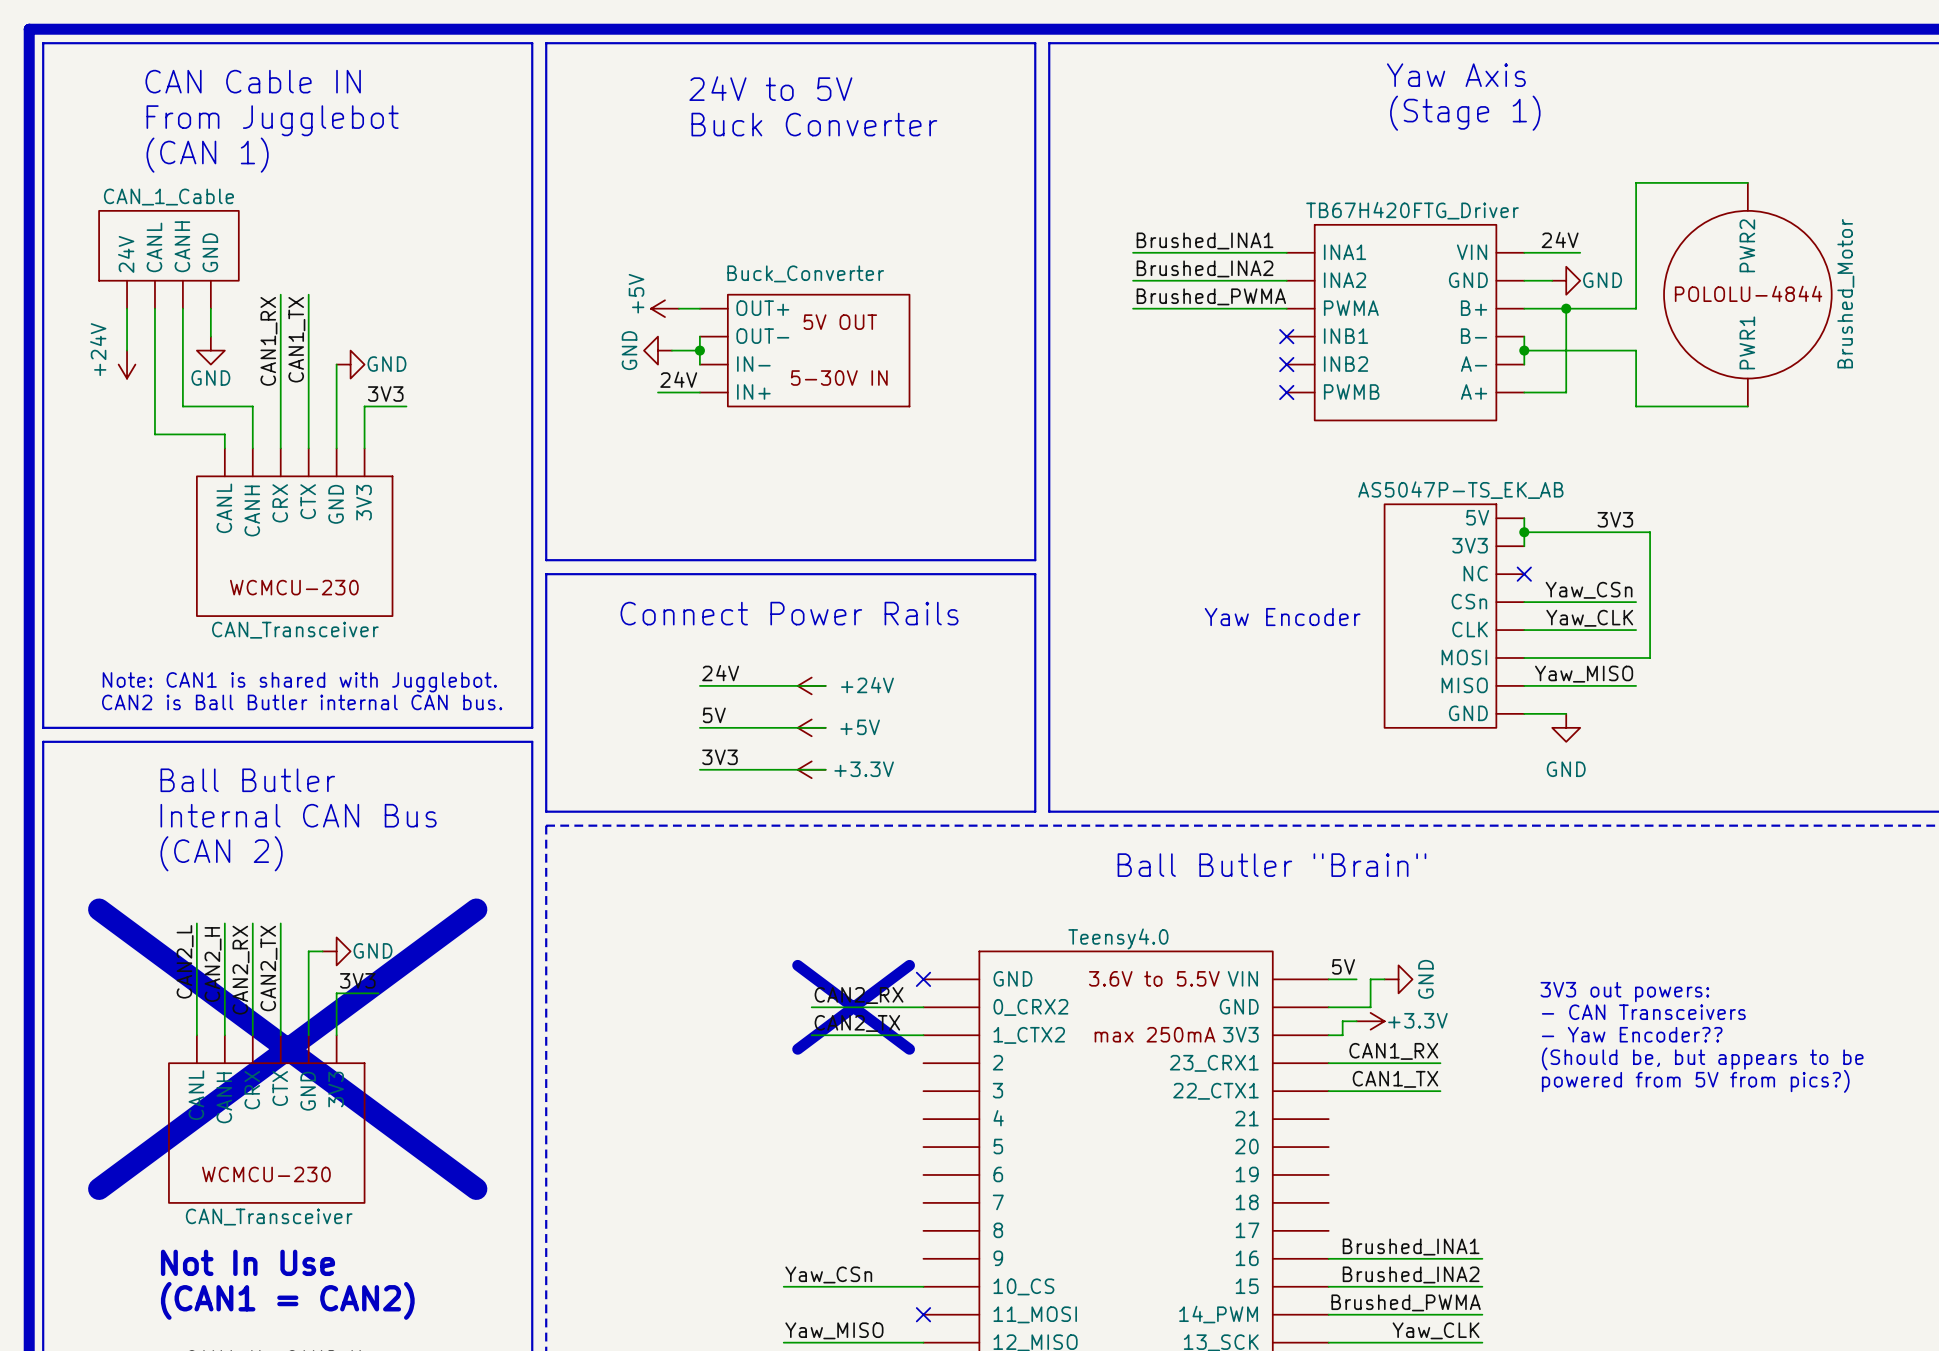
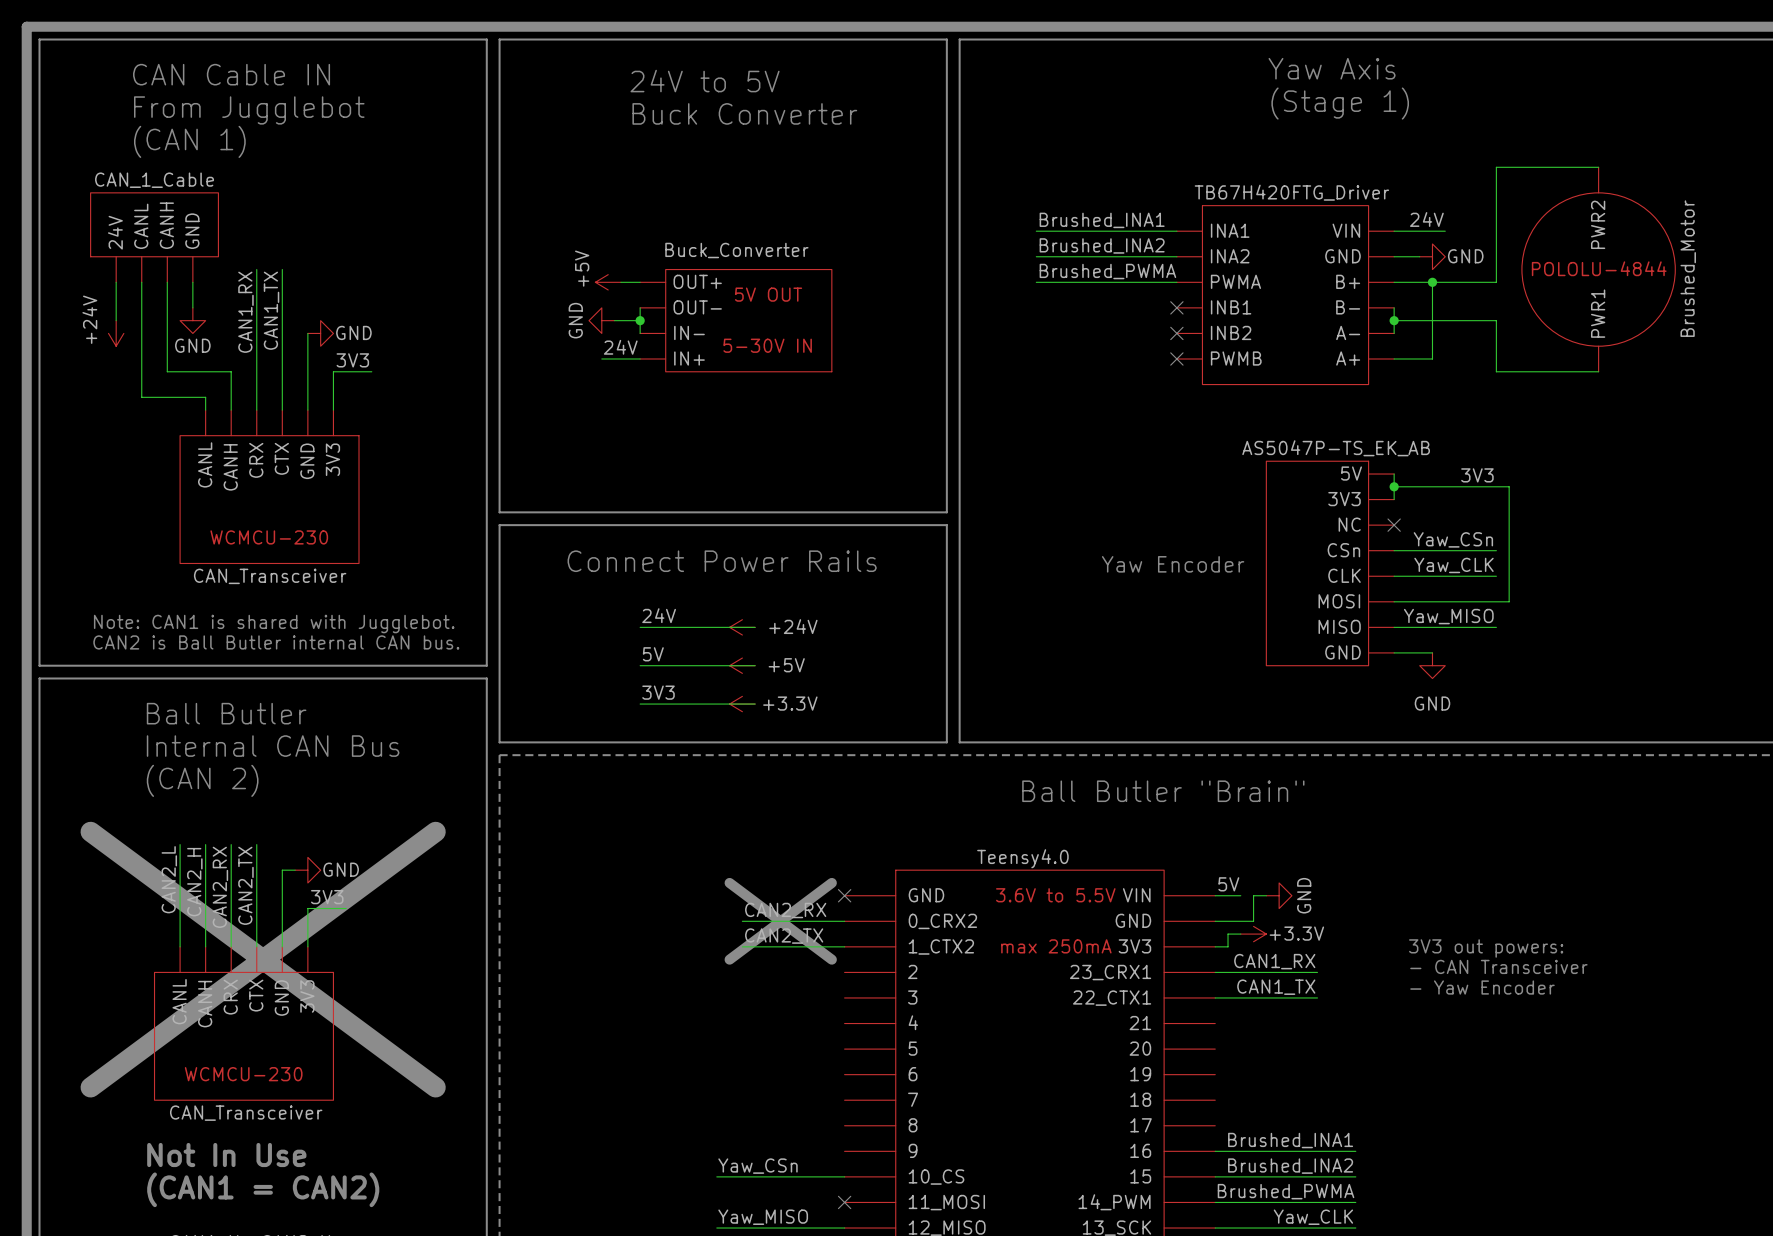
text: 3V3 out powers: (1624, 992) -> none
text: - CAN Transceivers (1643, 1012) -> none
text: - Yaw Encoder?? (1632, 1034) -> 3V3 out powers: (1486, 948)
text: (Should be, but appears to be (1702, 1058) -> - CAN Transceiver (1498, 966)
text: powered from 5V from pics?) (1695, 1081) -> - Yaw Encoder (1482, 987)

